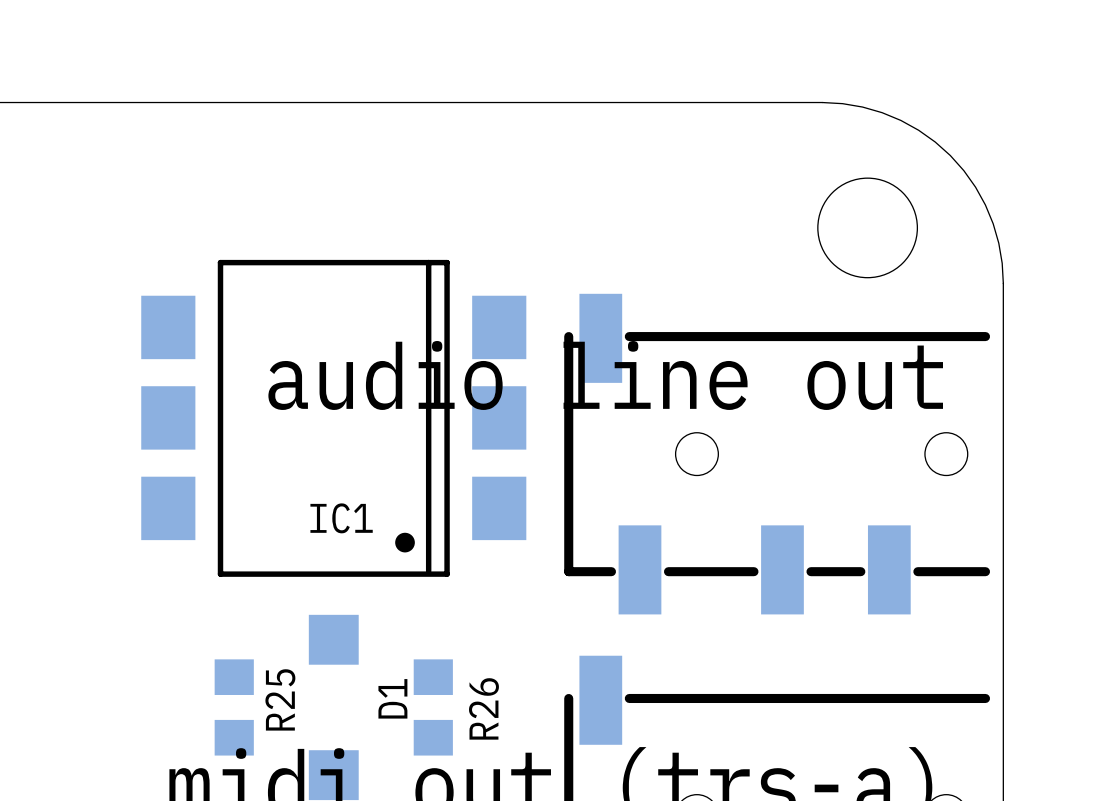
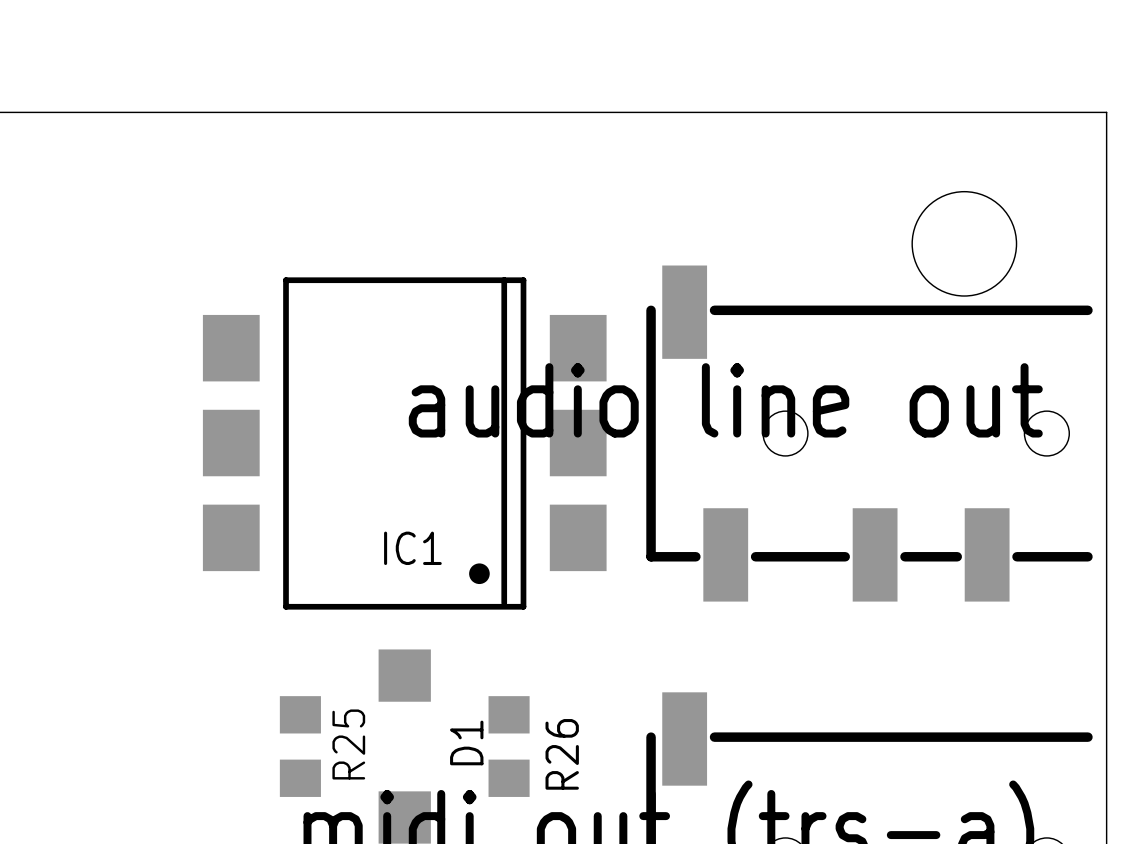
board edge: (822, 102) (862, 107) (900, 120) (918, 130) (950, 155) (975, 187) (985, 204) (998, 243) (1003, 283) -> (916, 112) (1106, 112) (1106, 302)
part position: (777, 454) -> (869, 433)

